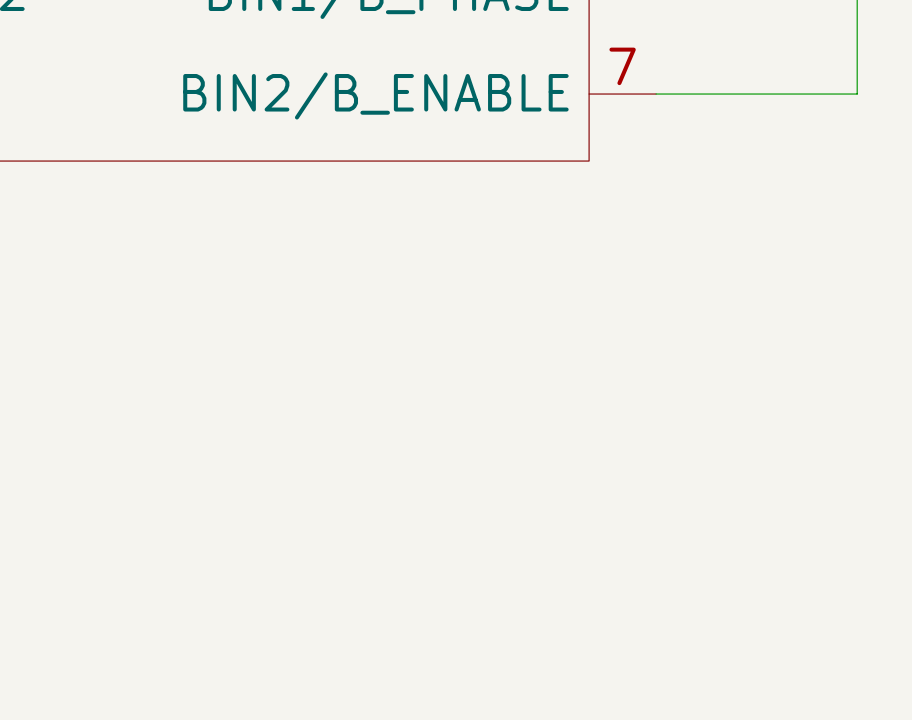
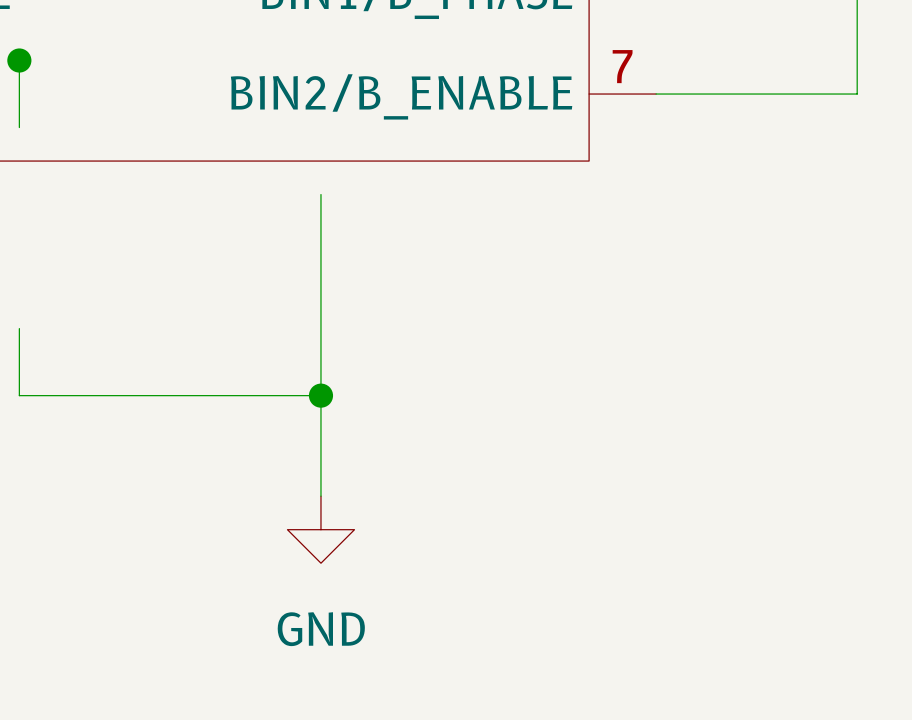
wire: none -> (19, 60) (19, 127)
junction: none -> (19, 60)
wire: none -> (320, 194) (320, 496)
wire: none -> (19, 328) (19, 395) (320, 395)
junction: none -> (320, 395)
power symbol: none -> GND (320, 529)

